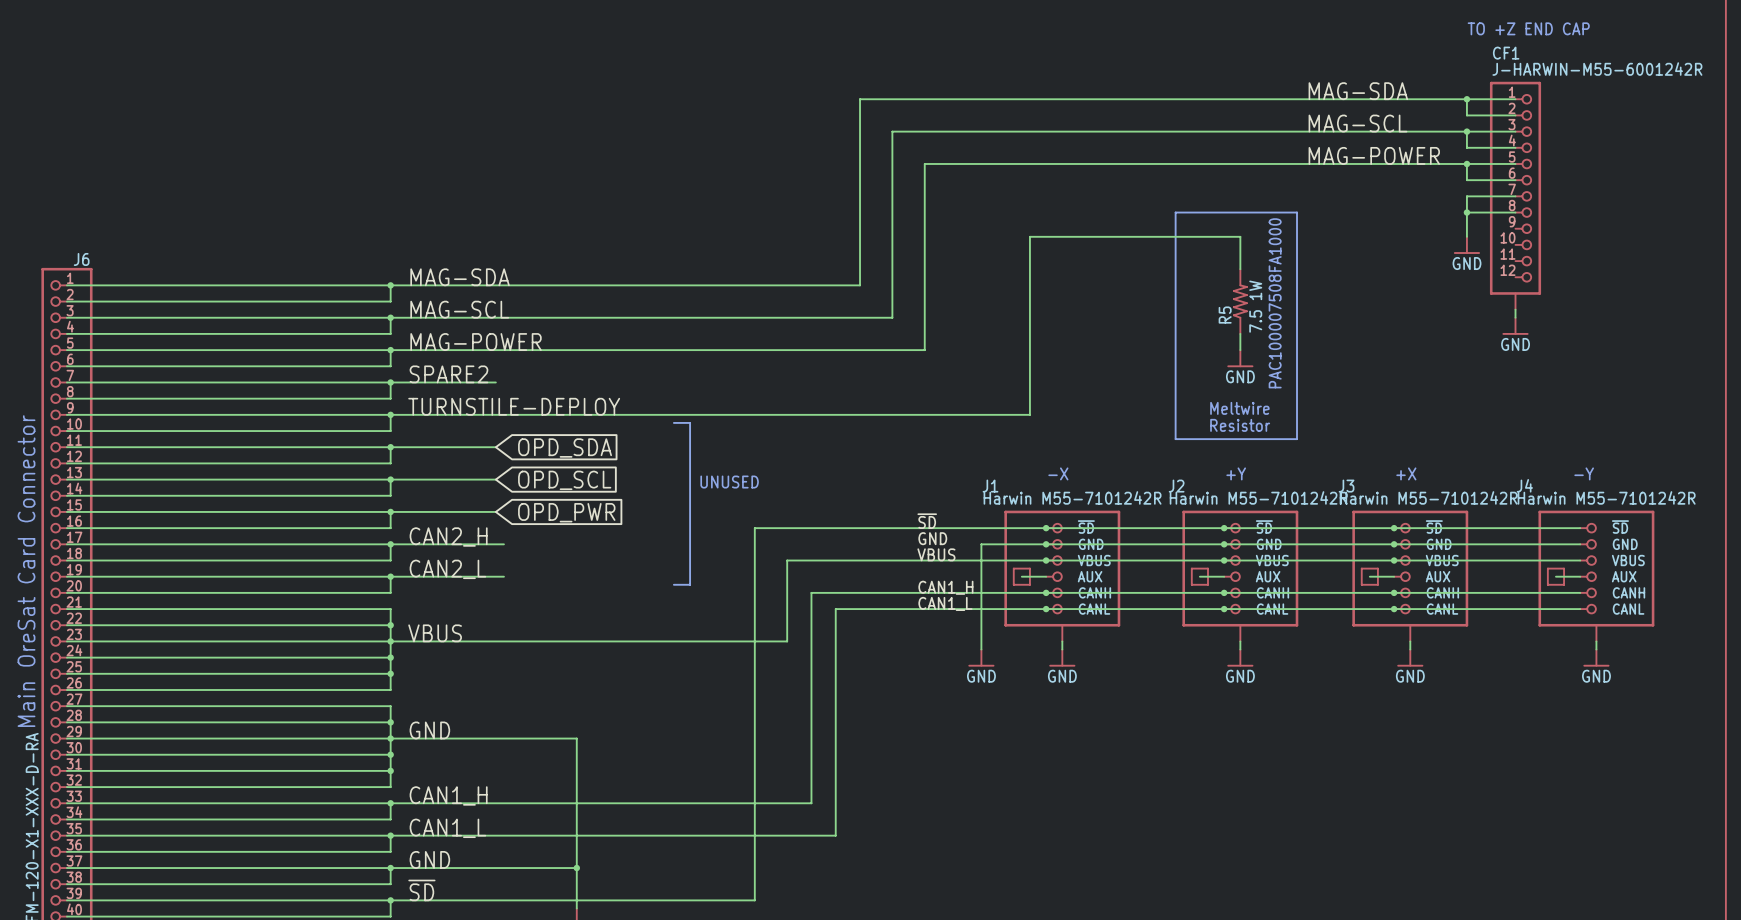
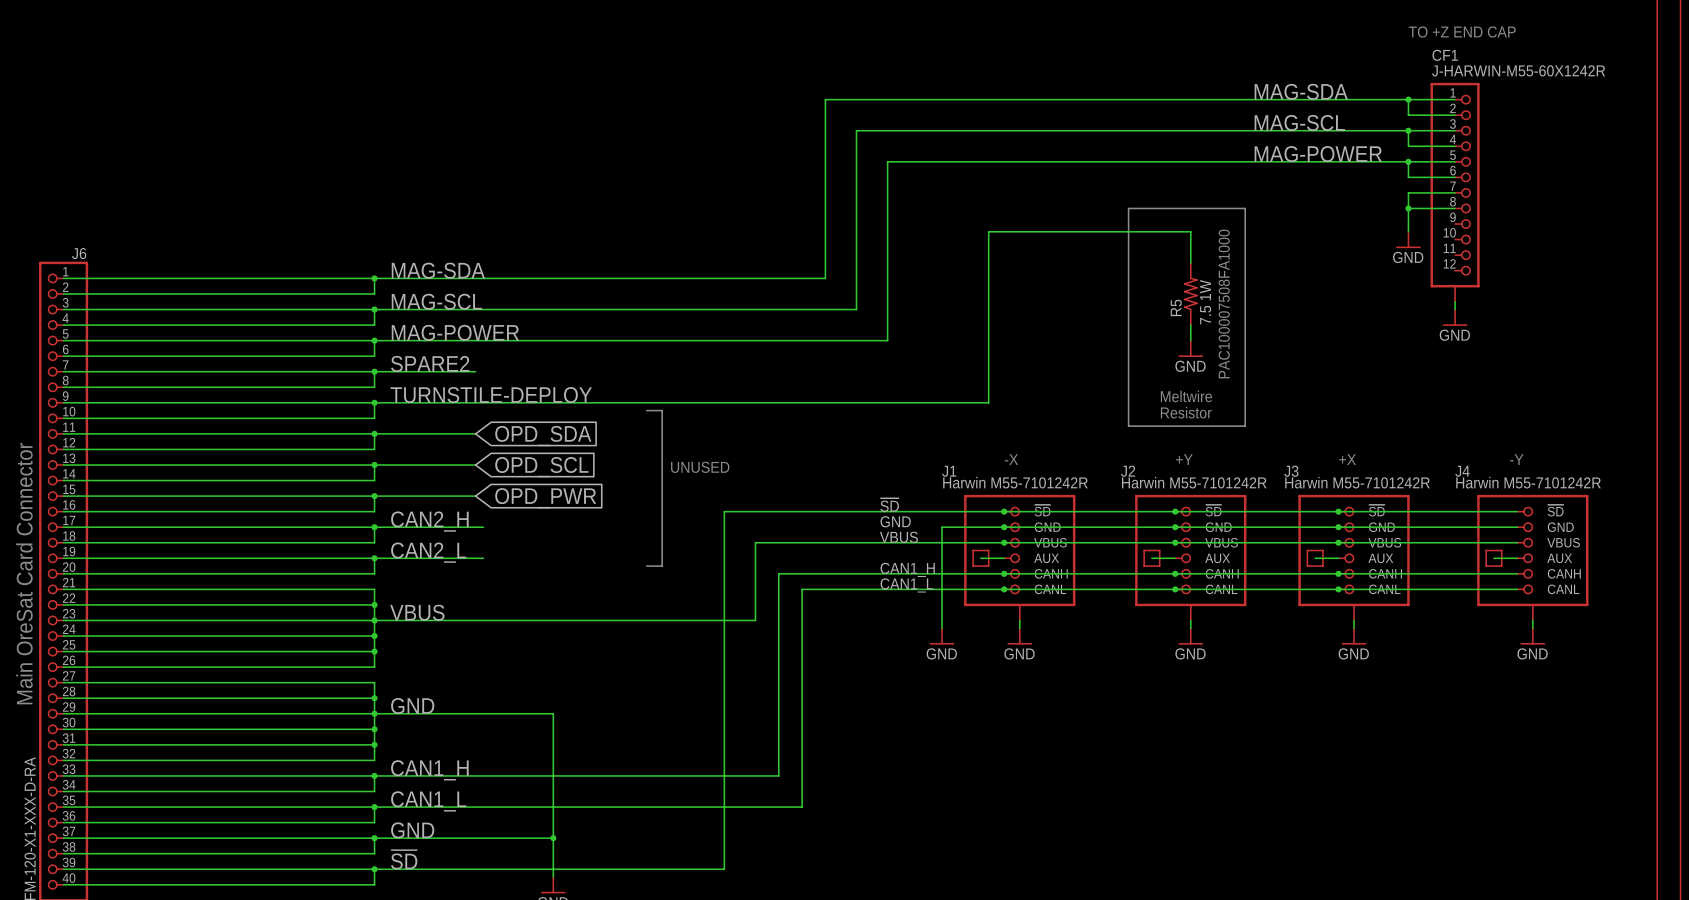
CF1 value: J-HARWIN-M55-6001242R (1597, 69) -> J-HARWIN-M55-60X1242R (1518, 70)

